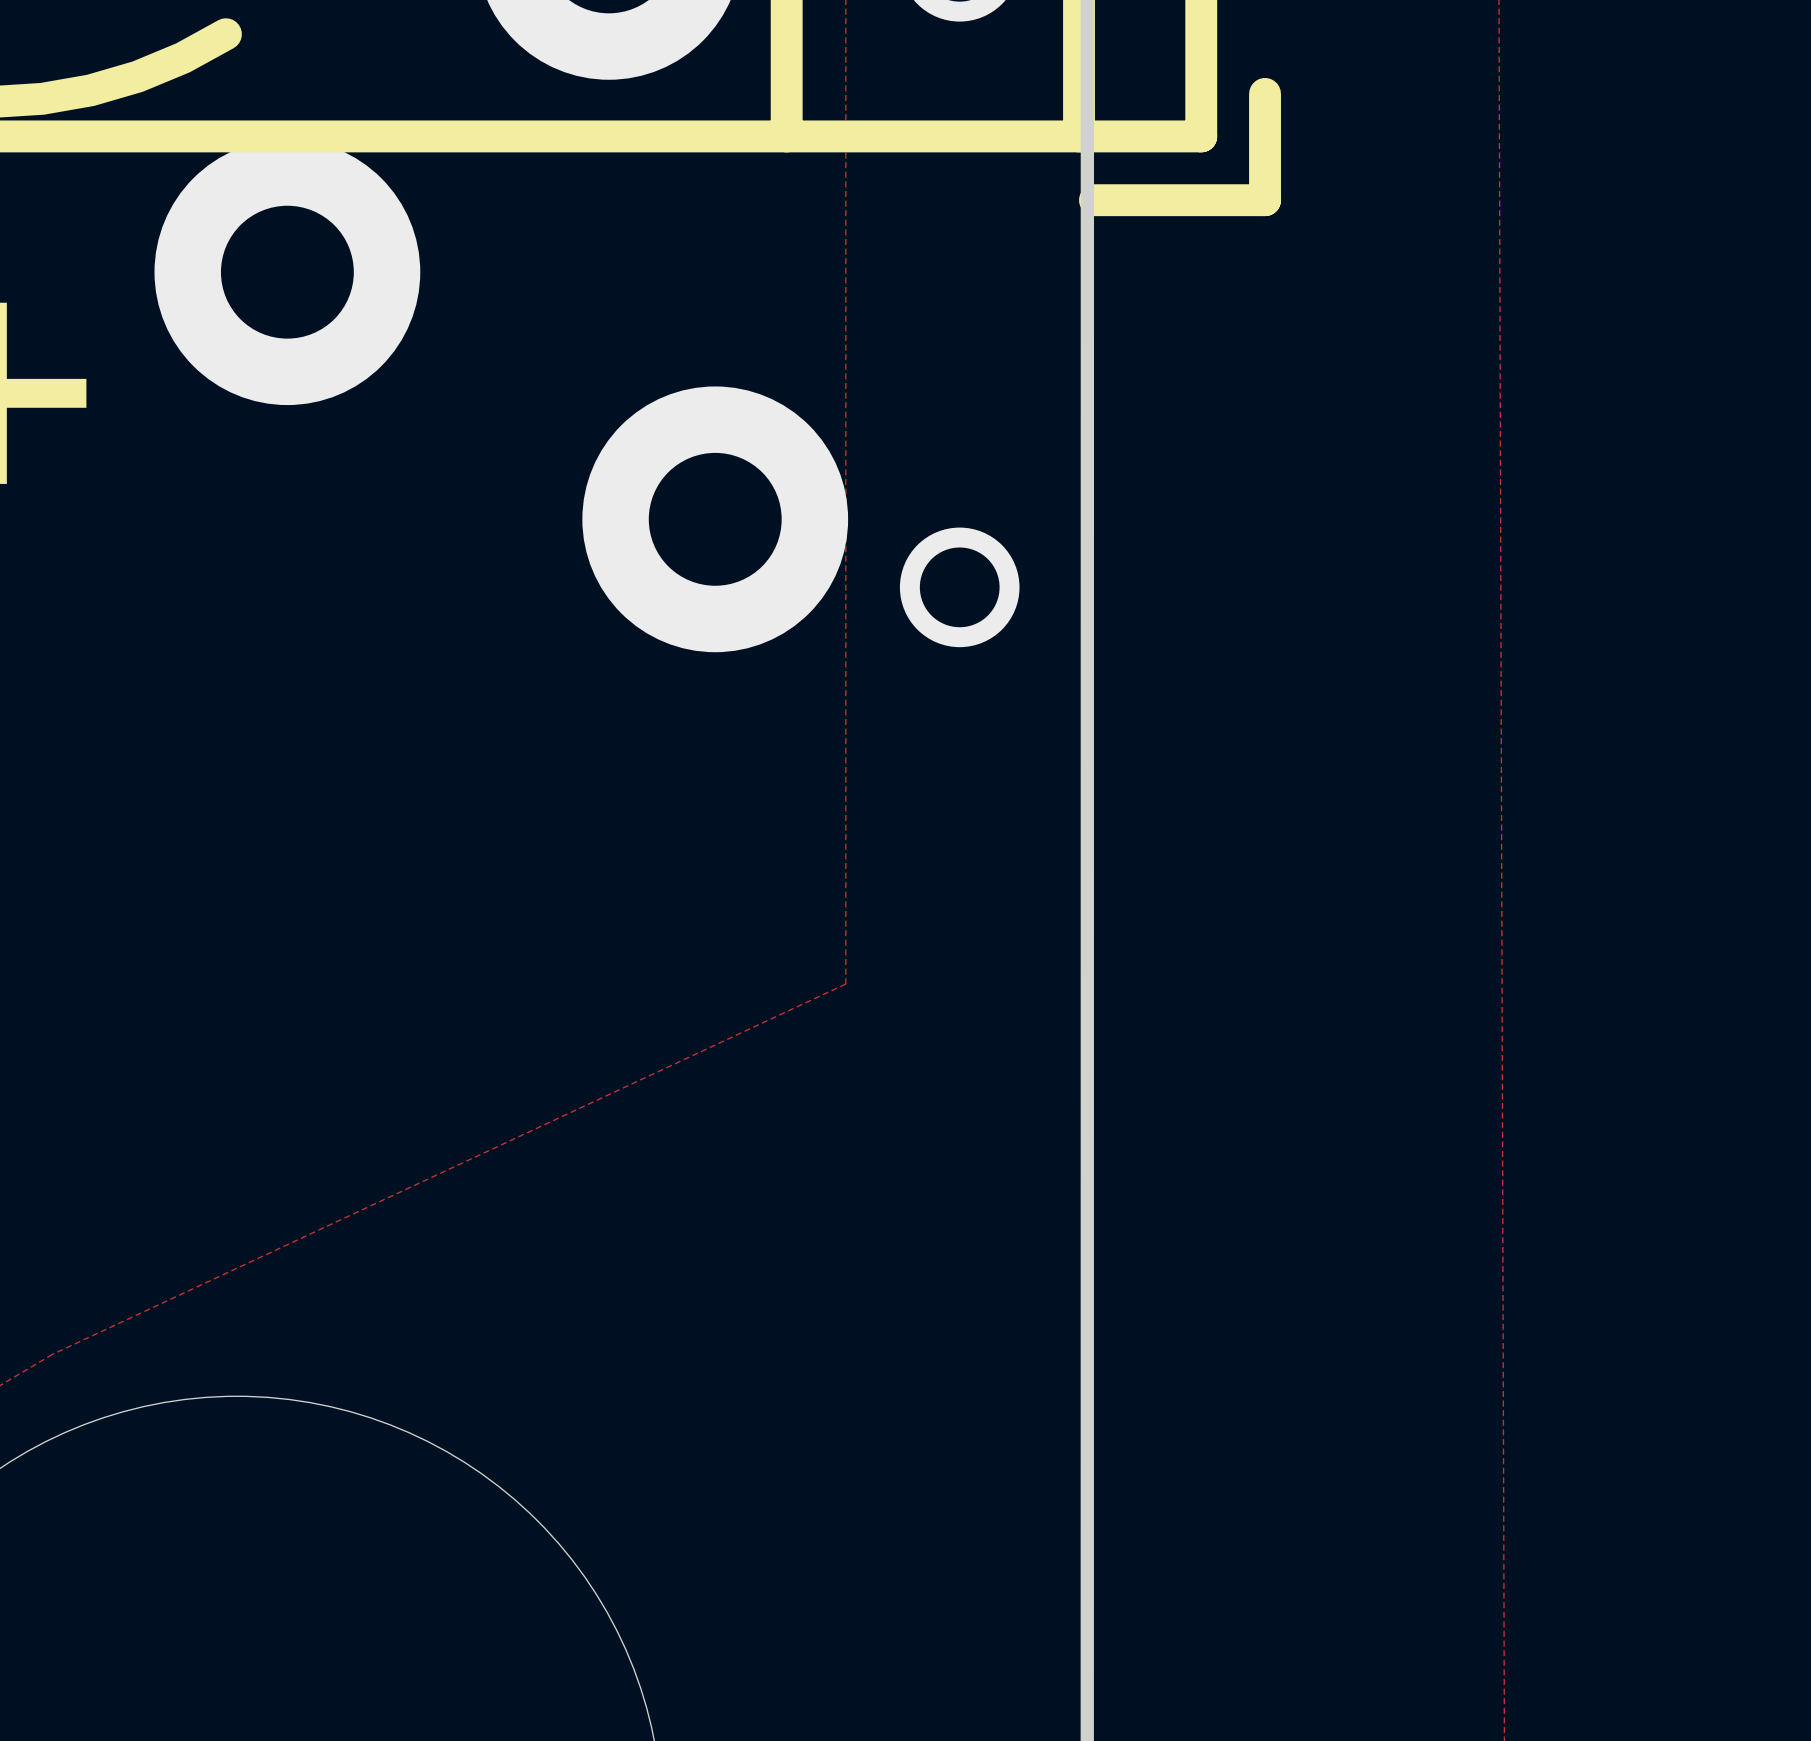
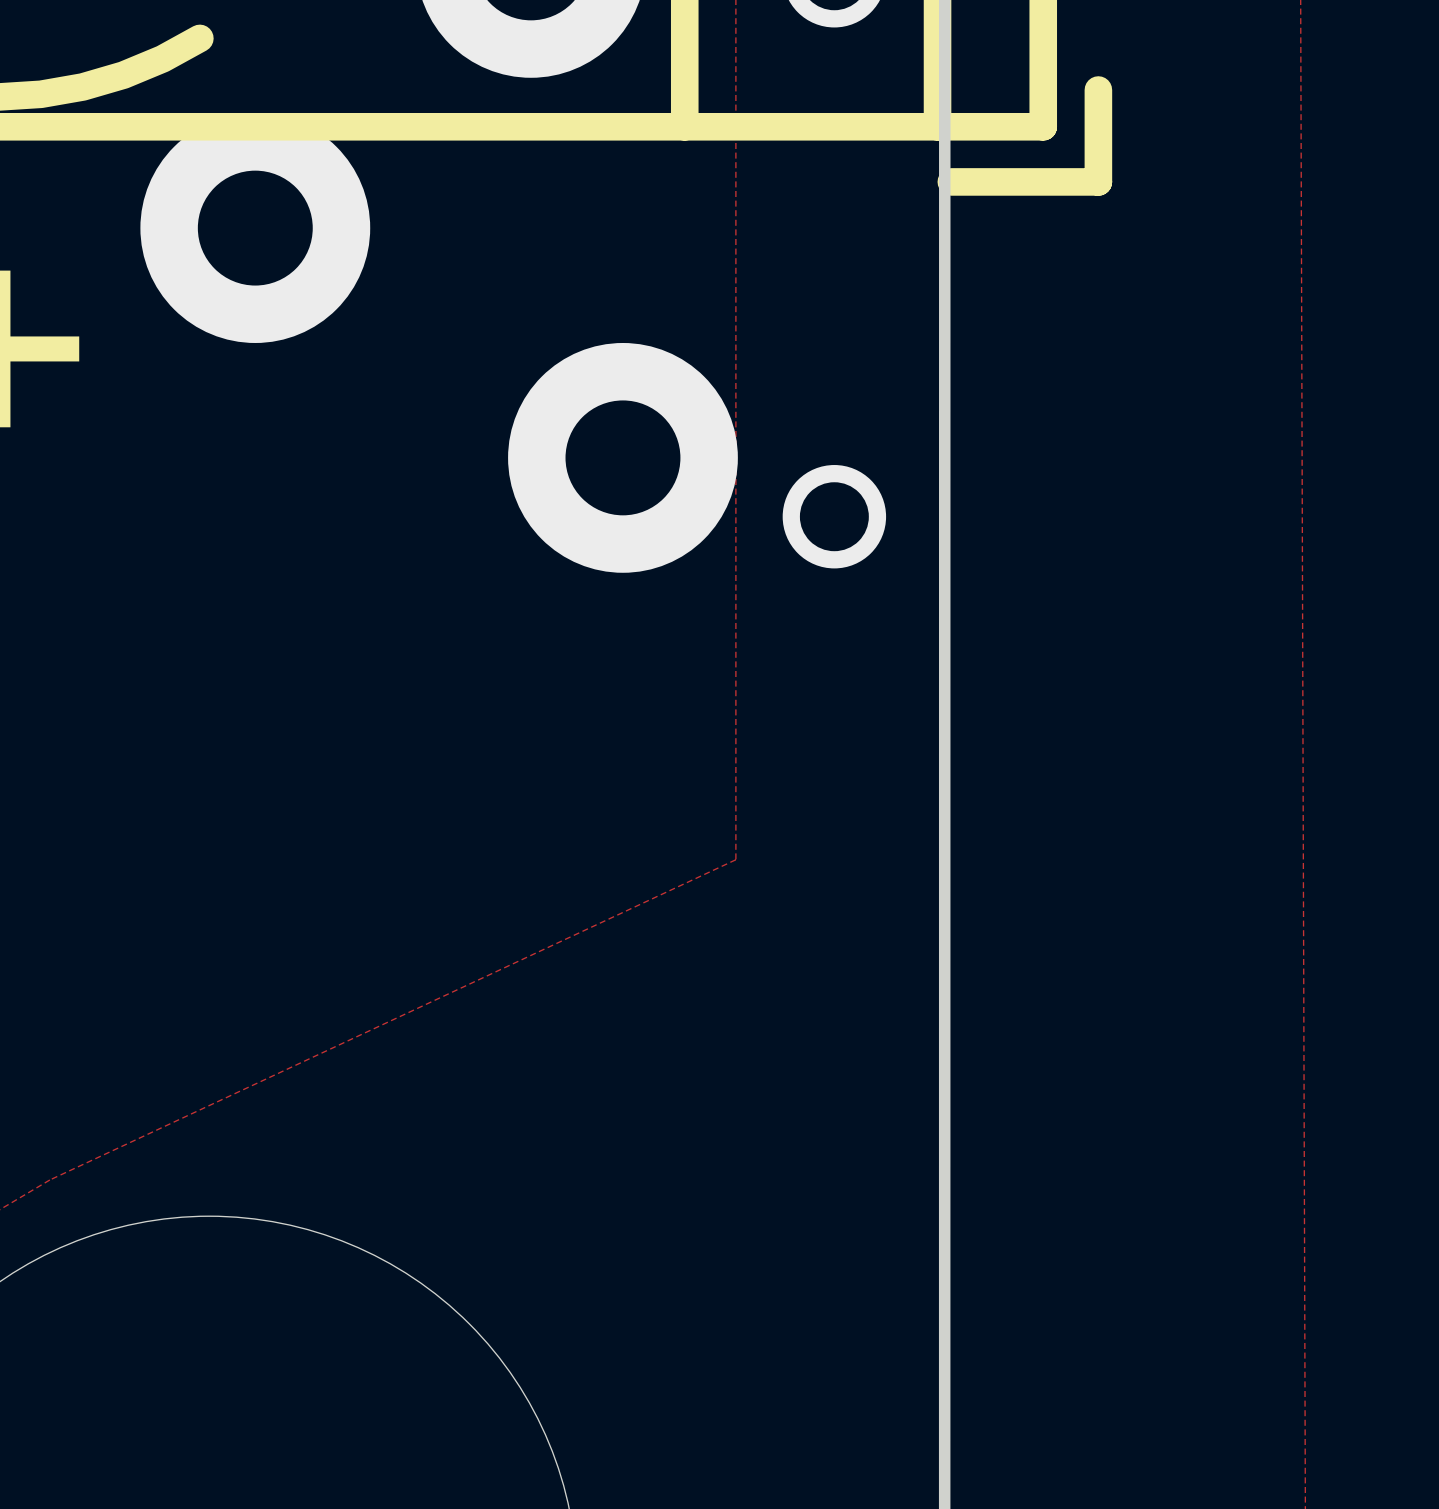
via position: (287, 272) -> (255, 228)

